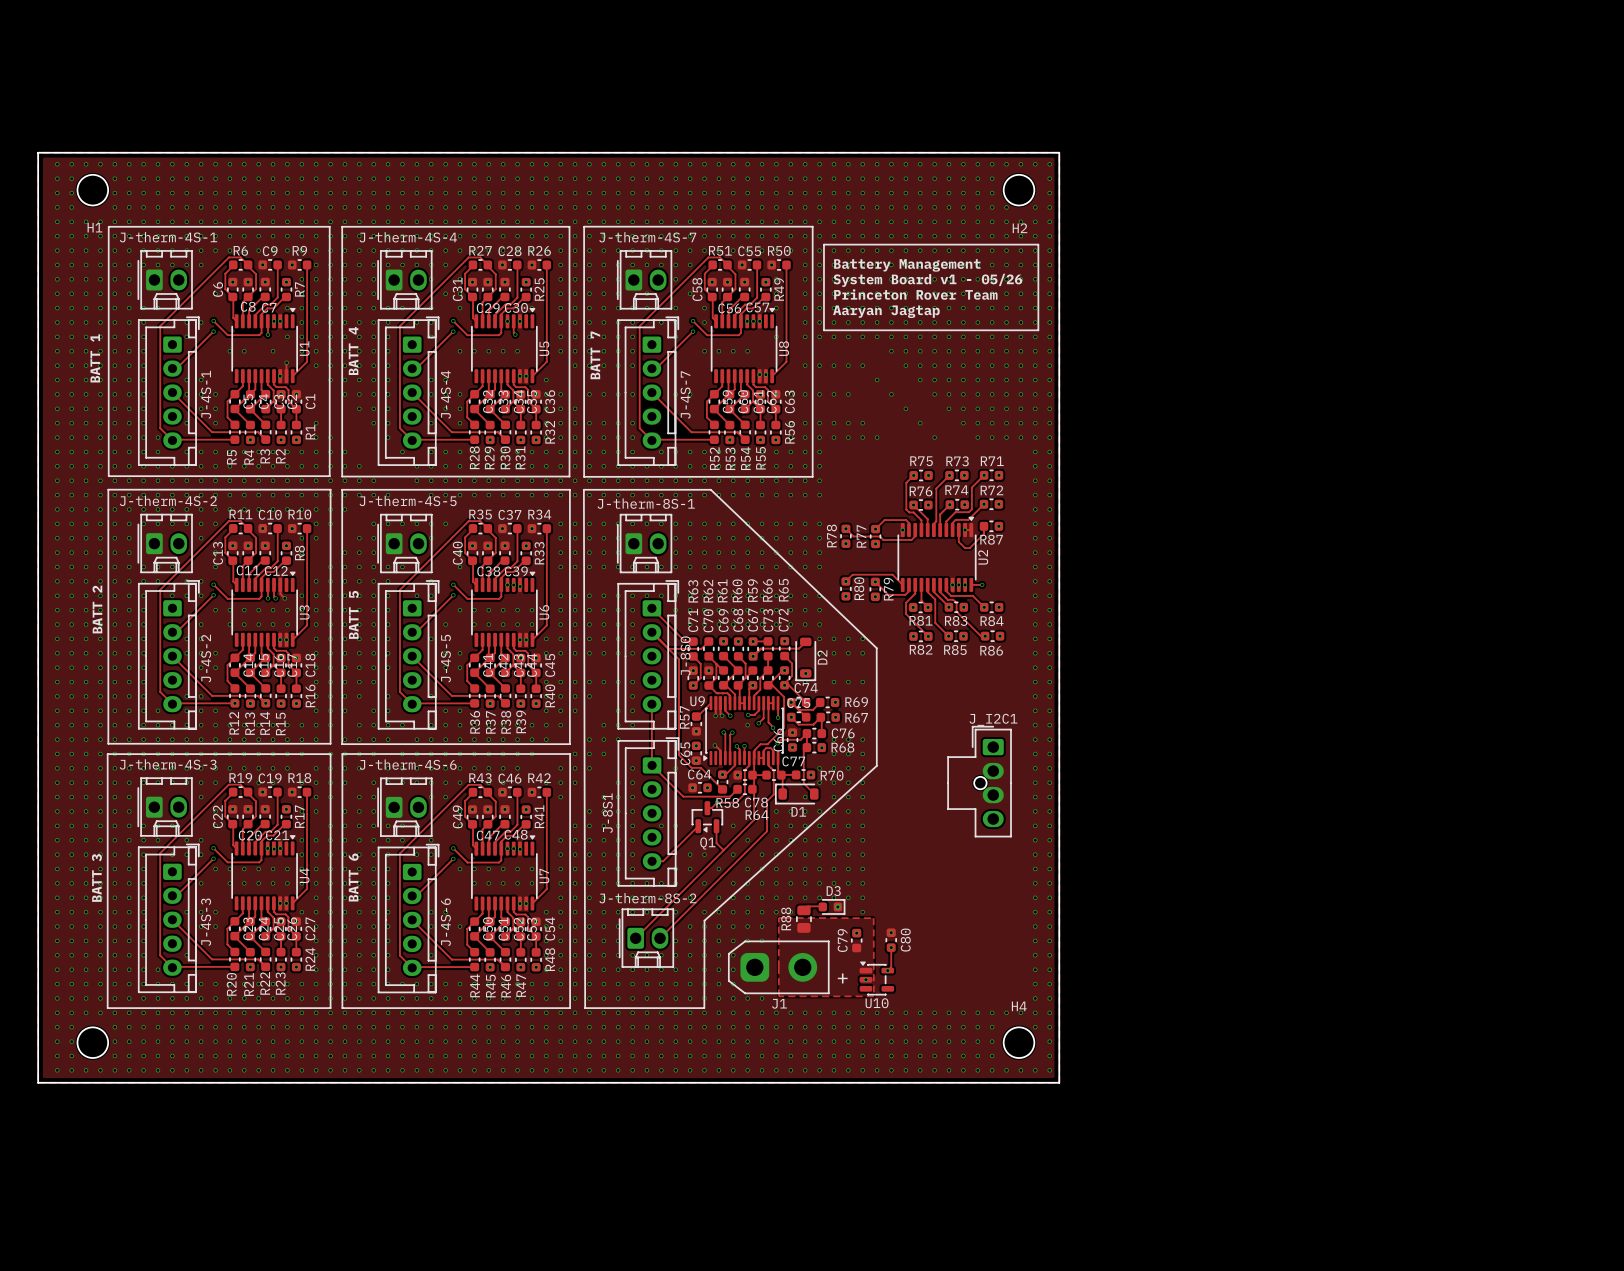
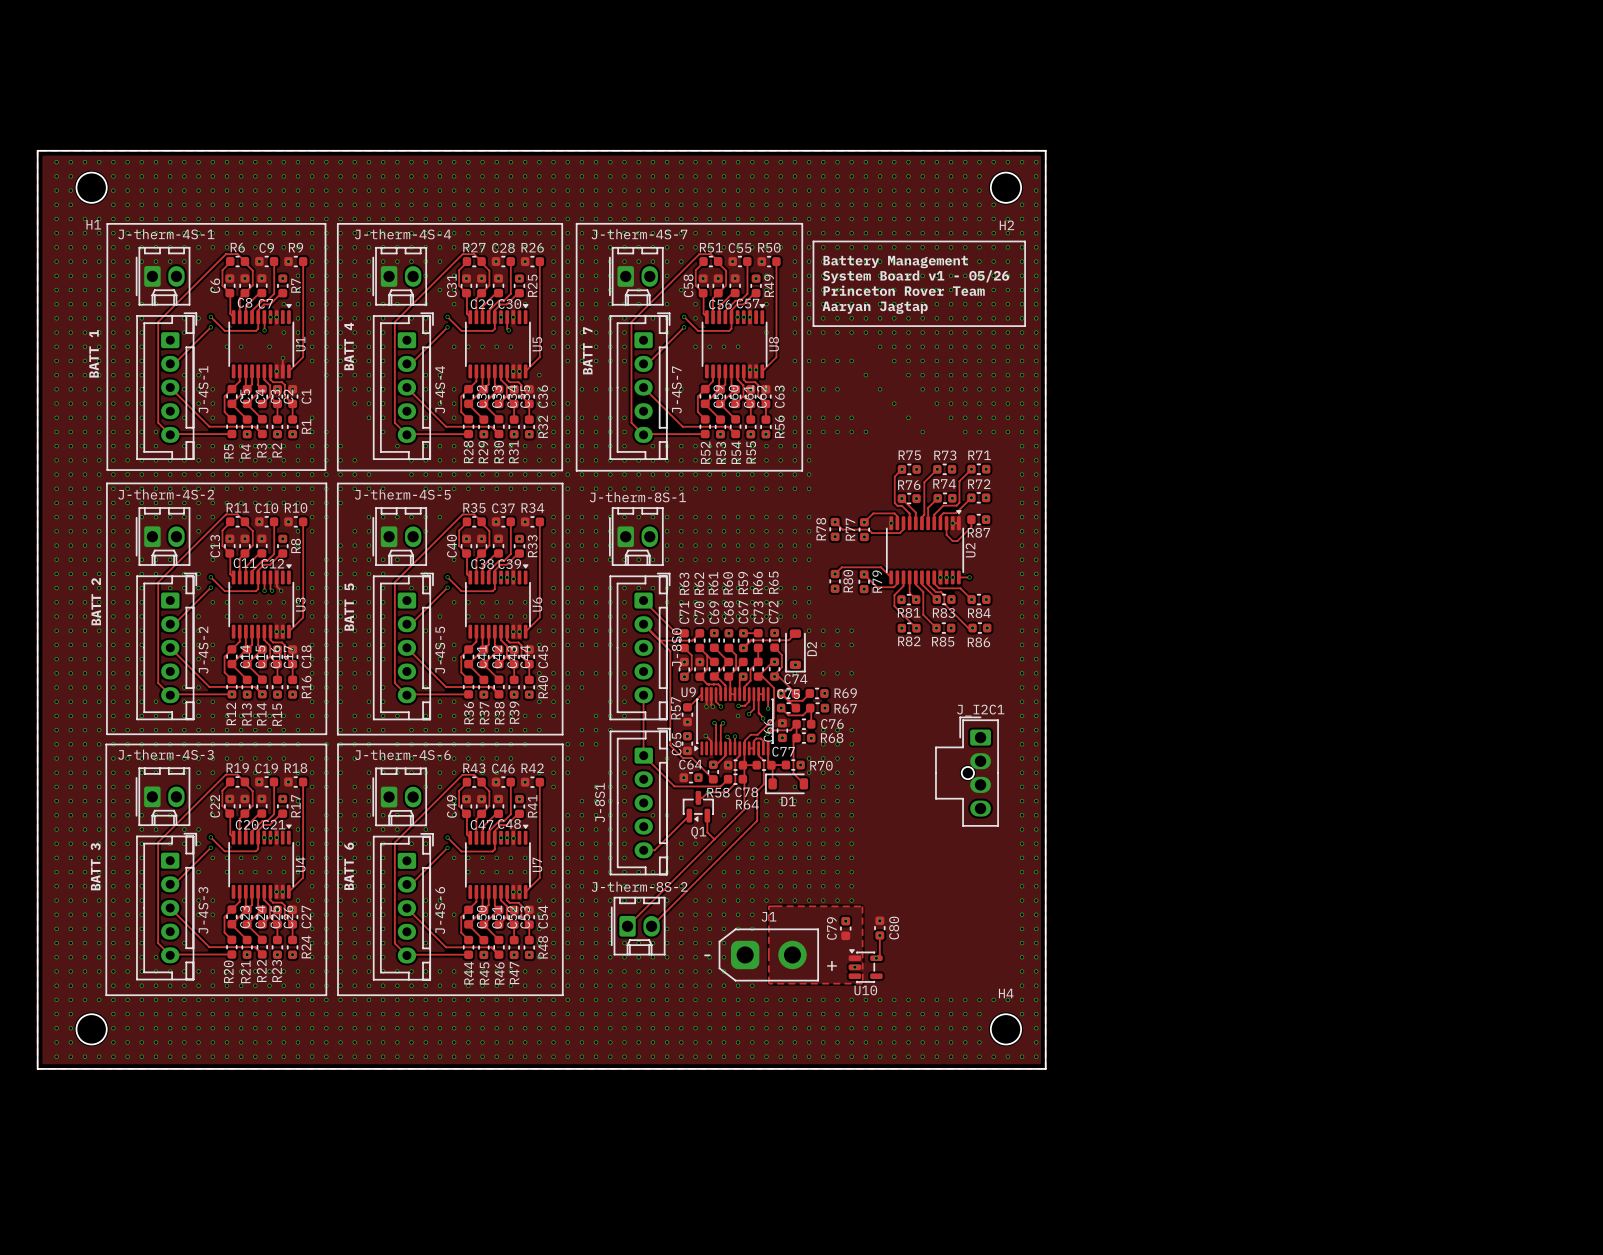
line: (583, 489) (585, 1008) (704, 1008) (704, 920) (876, 765) (876, 648) (710, 489) (583, 489) -> none
track: (822, 906) (807, 906) (803, 910) -> none
D3: (831, 906) -> none
via: (837, 906) -> none
via: none -> (794, 900)
via: none -> (809, 900)
via: none -> (823, 900)
via: none -> (837, 900)
R88: (803, 919) -> none
J1 text: none -> - (707, 955)
J1 name position: J1 (779, 1003) -> J1 (769, 916)

